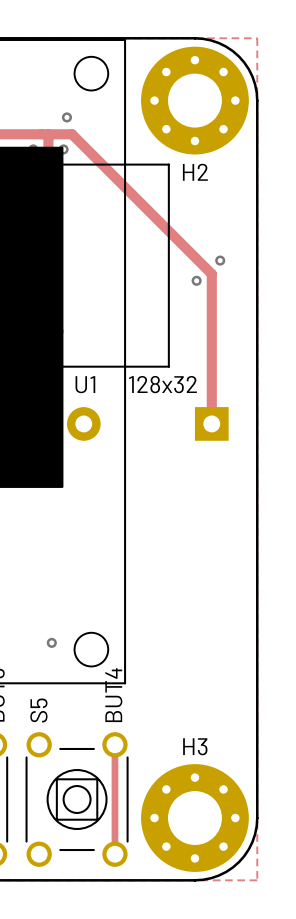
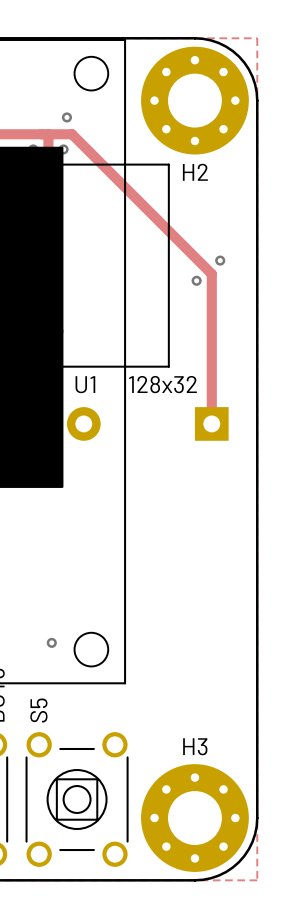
S5 value: BUT4 (113, 695) -> none
track: (114, 744) (114, 854) -> none

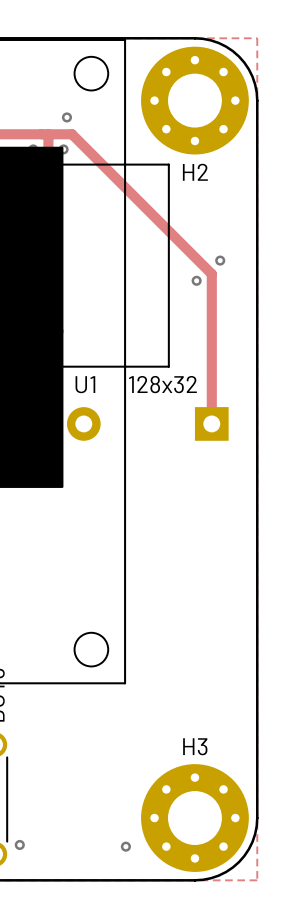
via: (51, 642) -> none
S5: (77, 799) -> none
via: none -> (19, 844)
via: none -> (125, 846)

